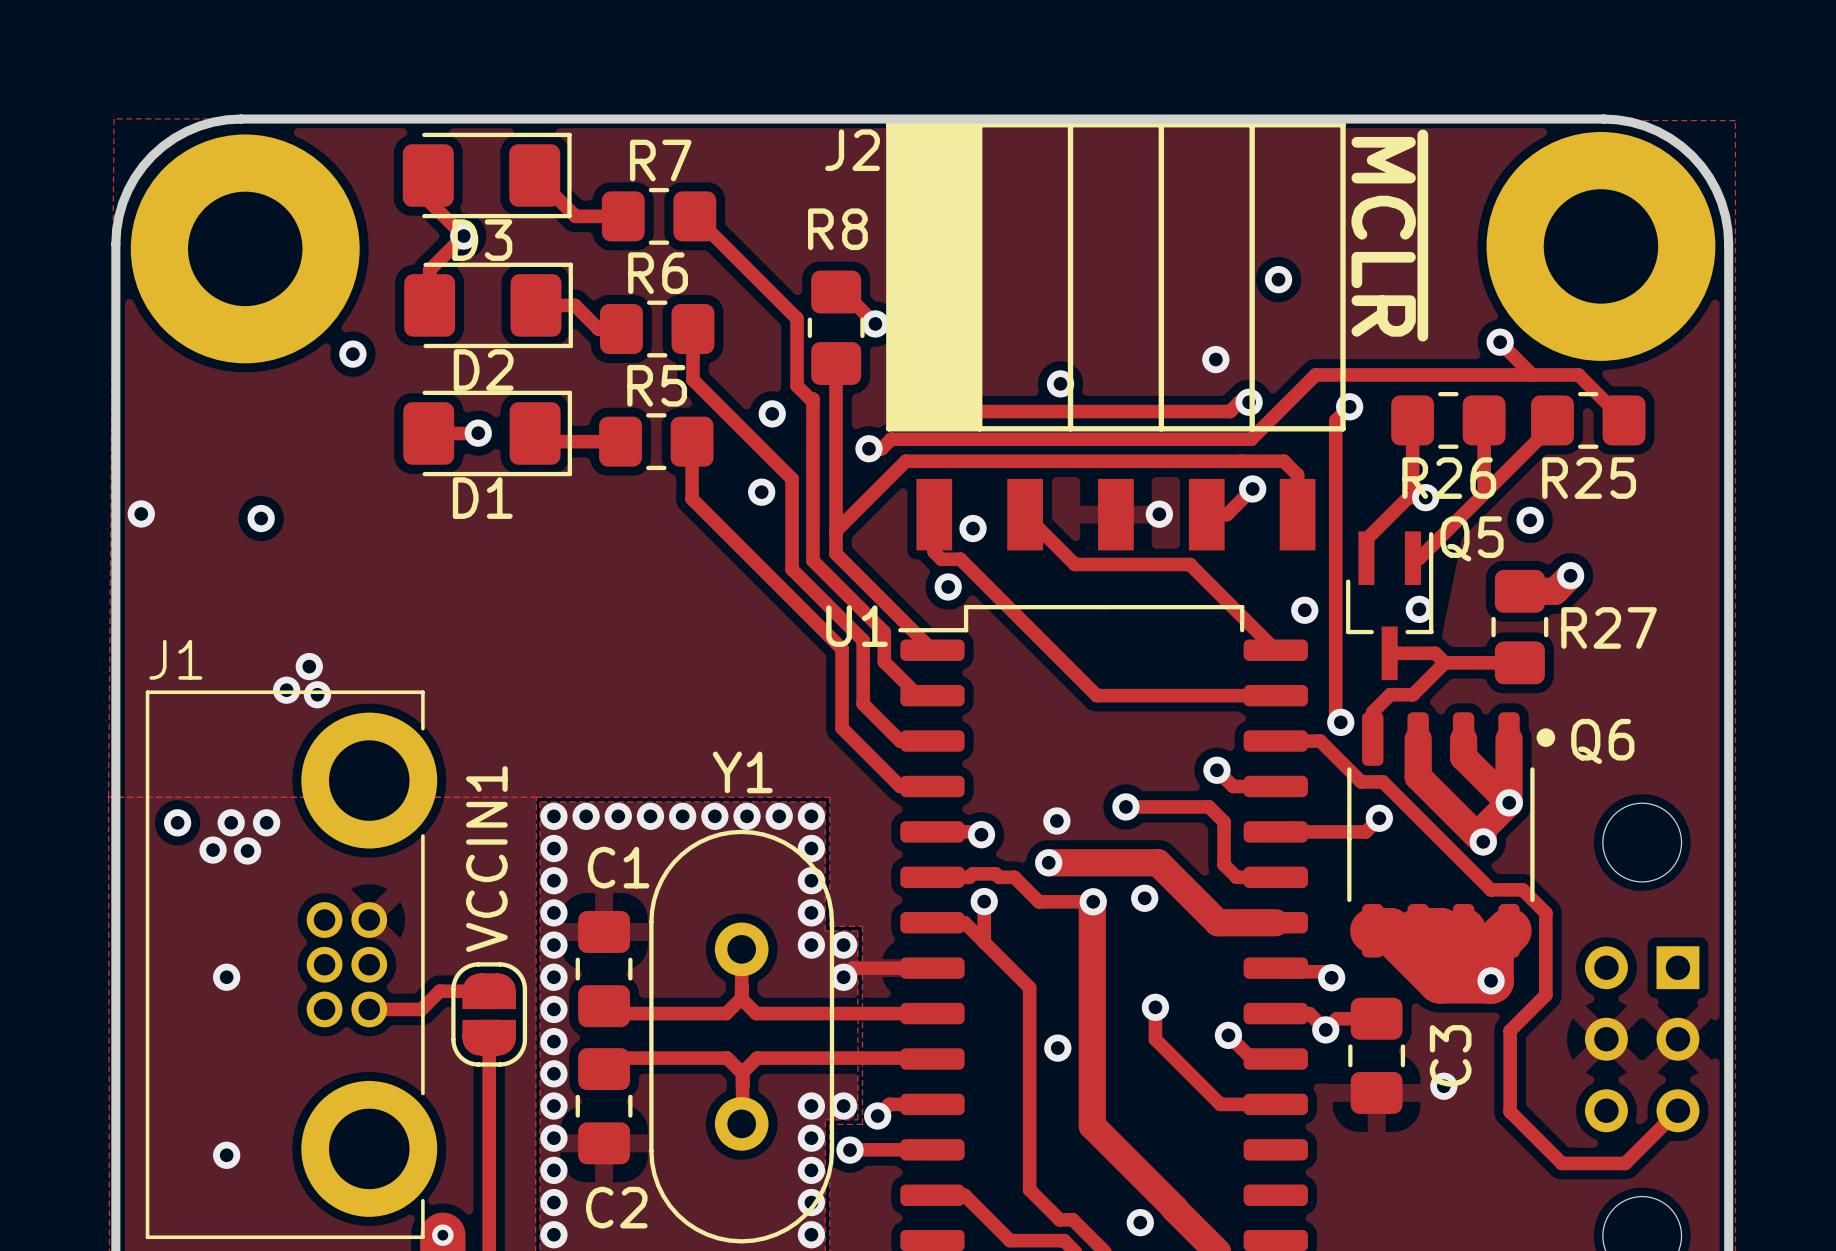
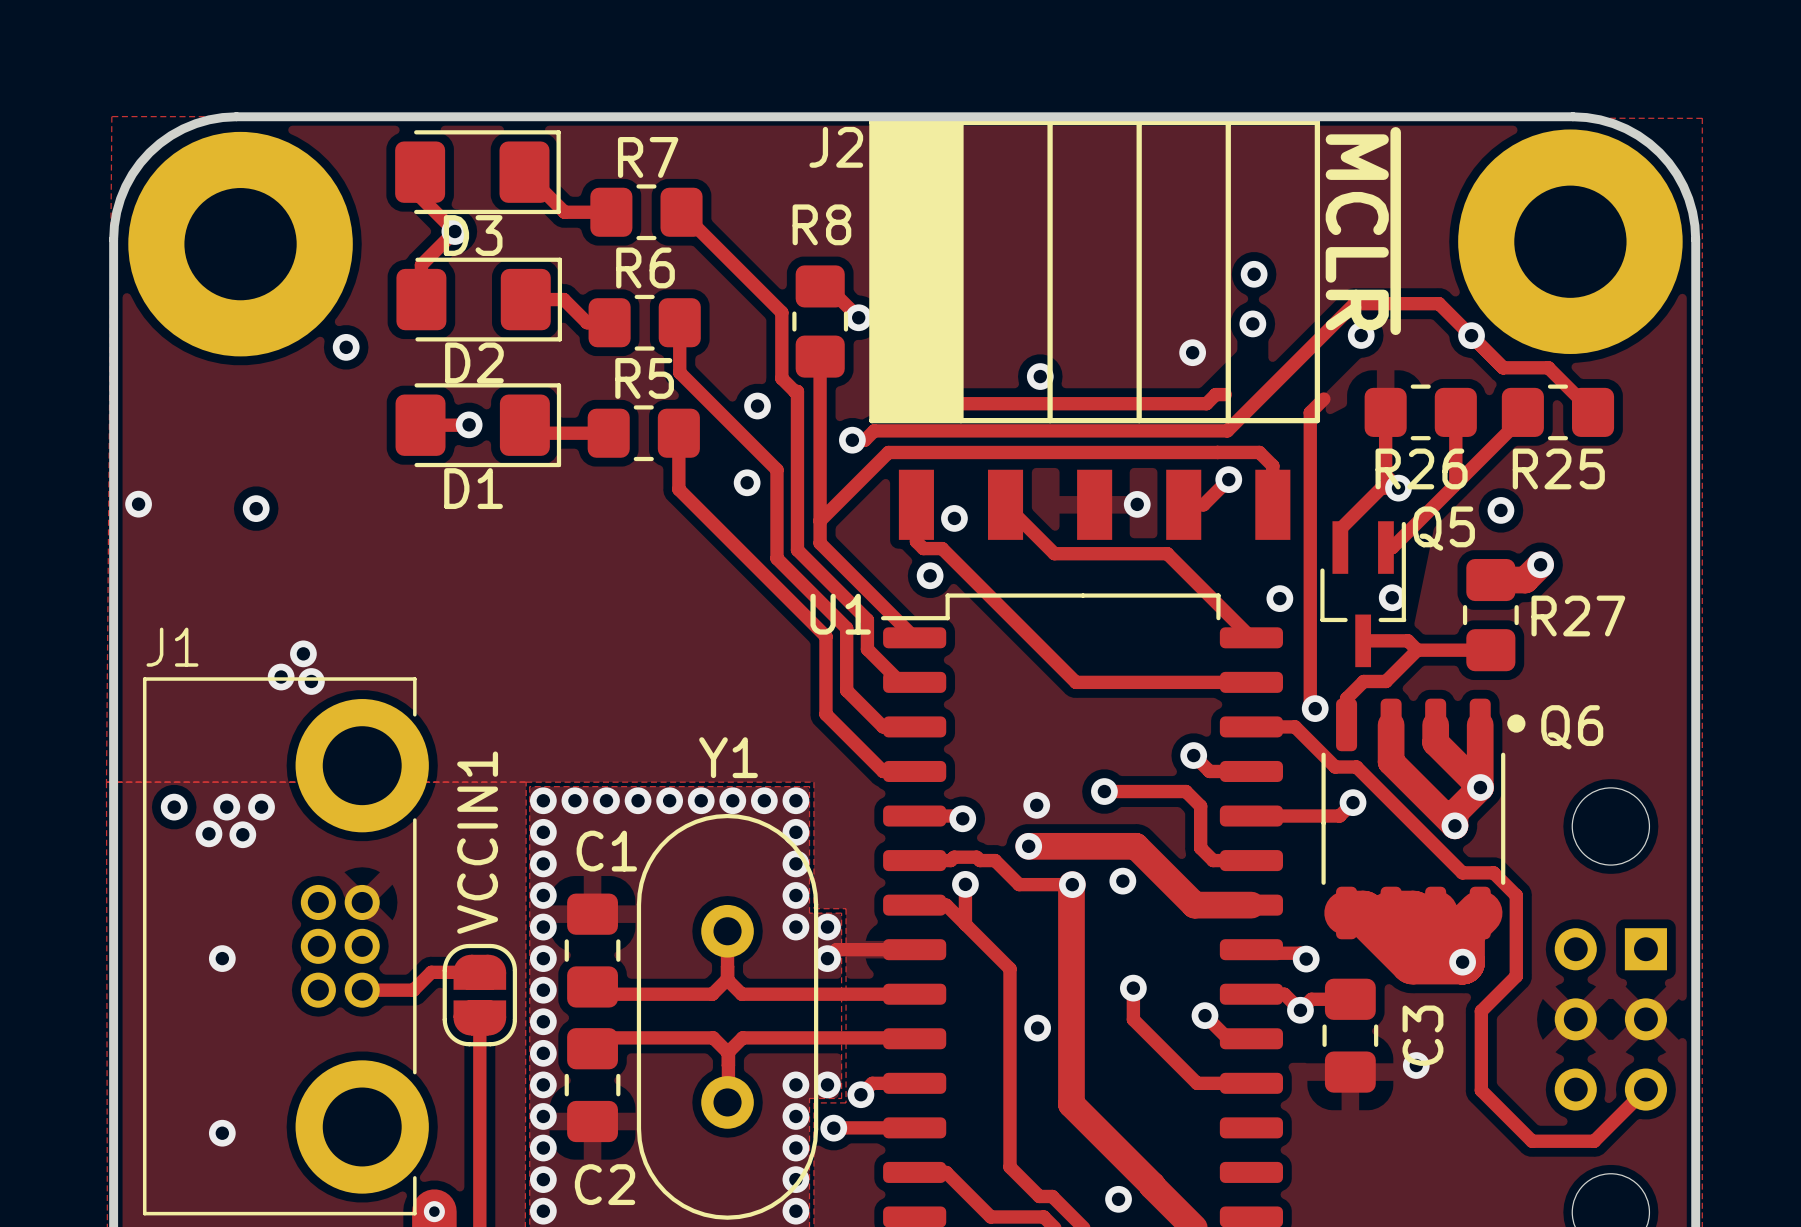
via: none -> (1252, 323)
via: none -> (1361, 335)
track: (1315, 374) (1532, 374) -> (1290, 367) (1354, 303) (1439, 303) (1471, 336)
via: (1249, 402) -> none
via: (1349, 406) -> none

